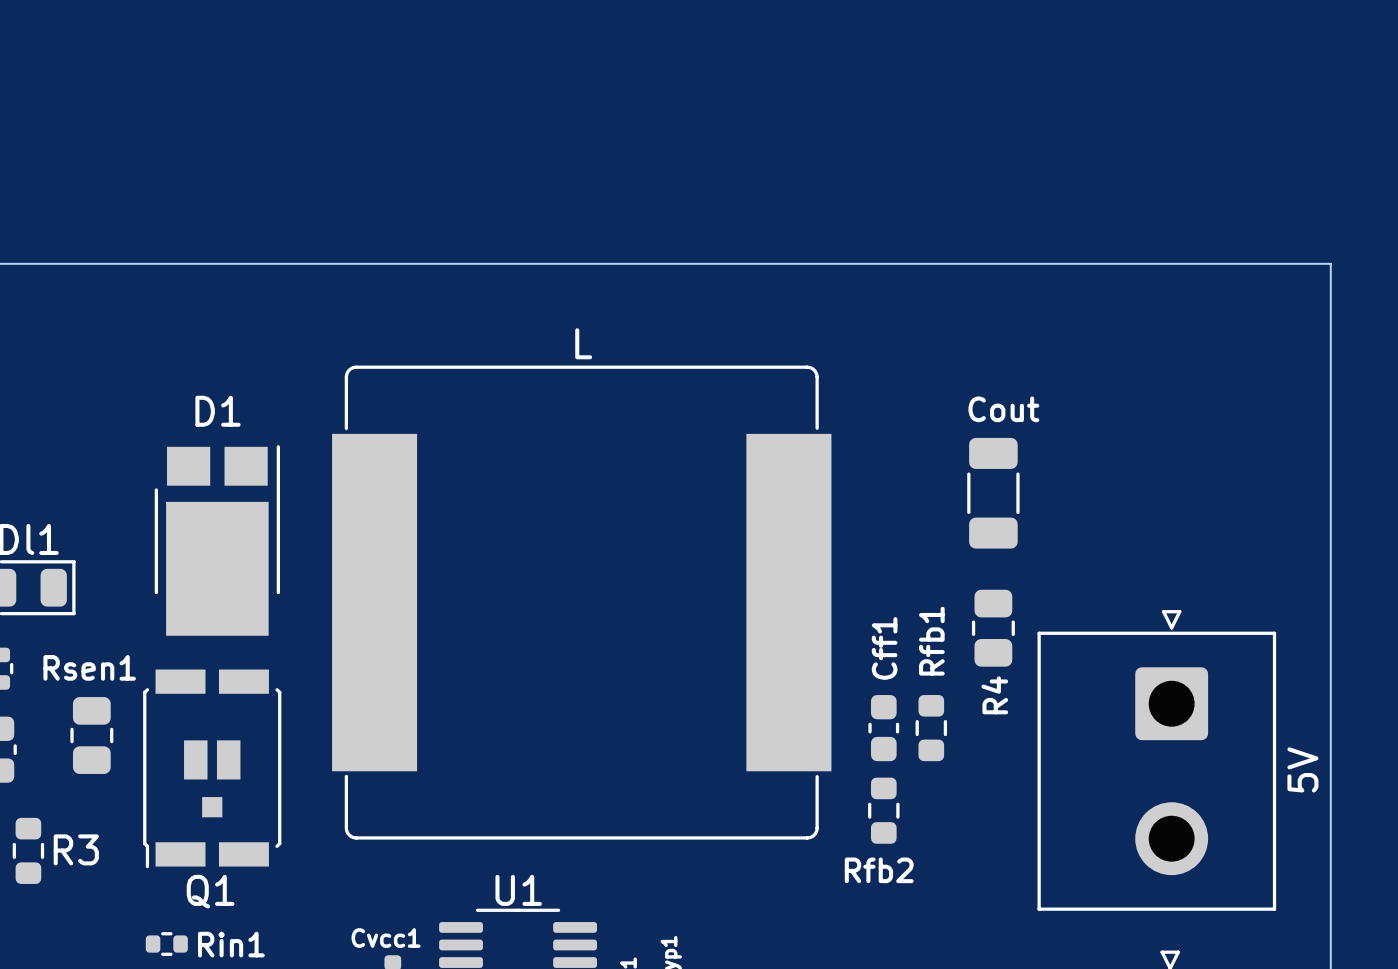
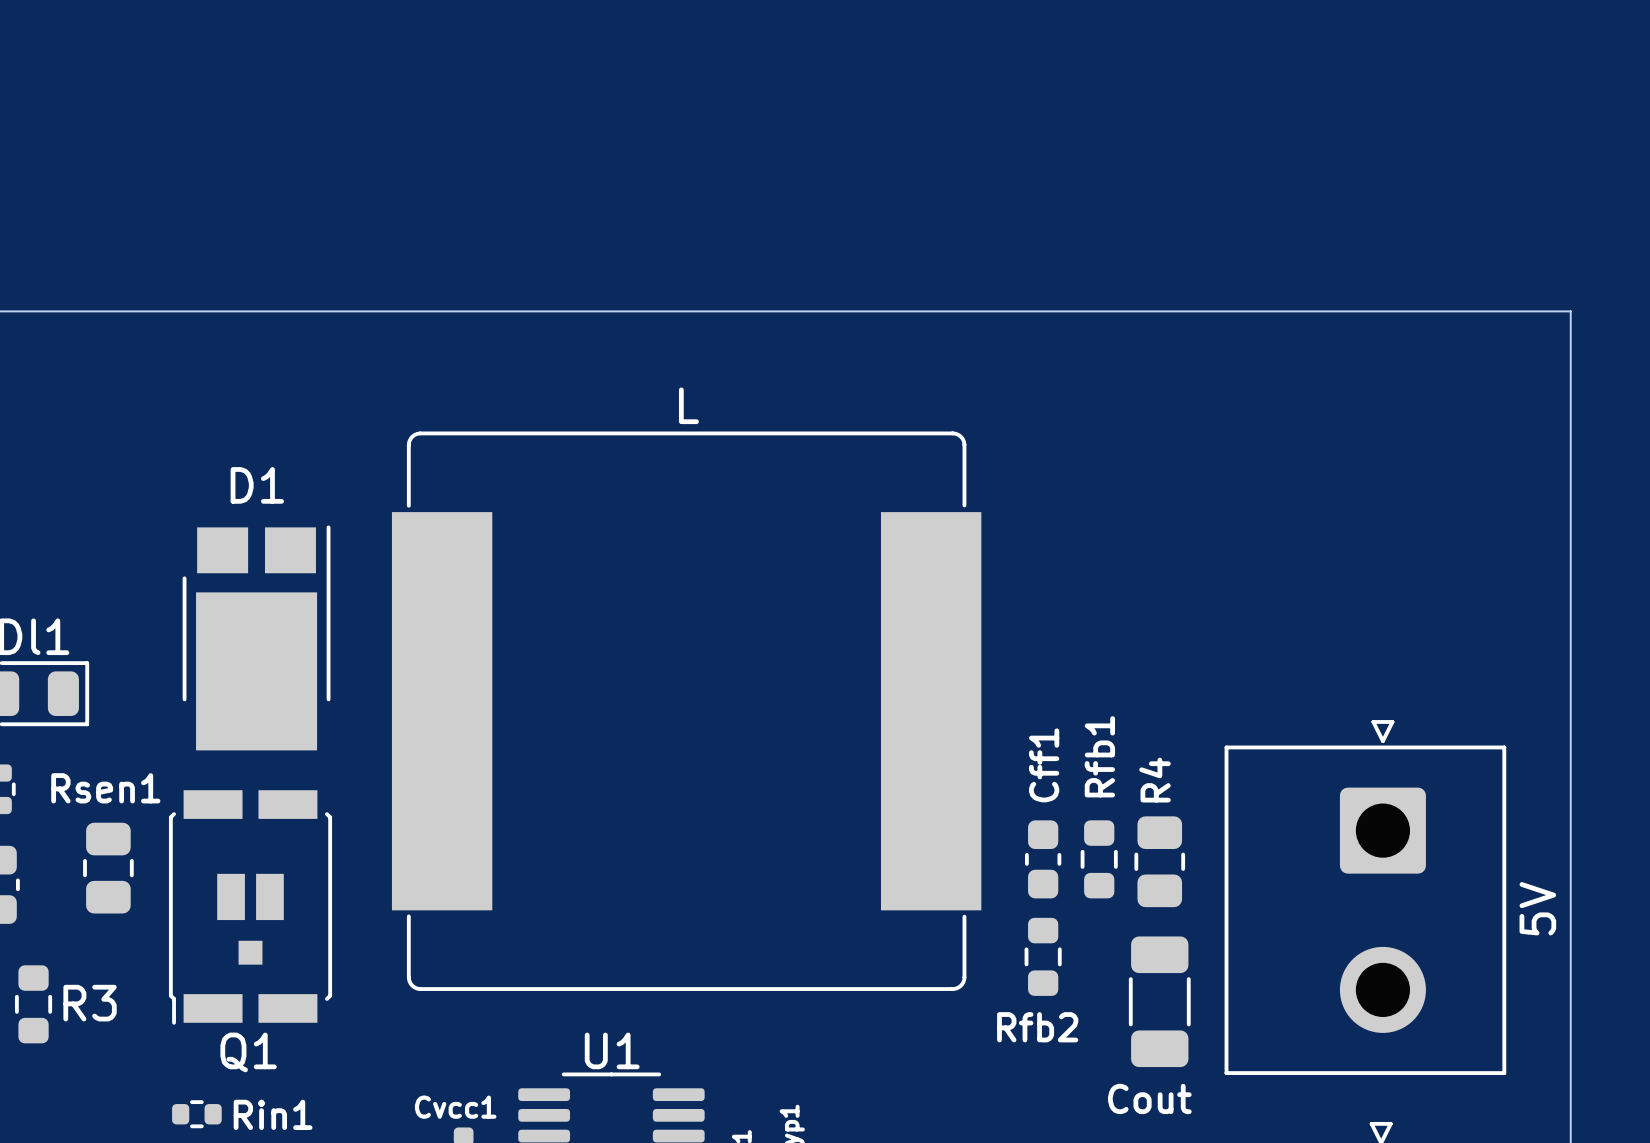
Cout name position: Cout (1003, 409) -> Cout (1149, 1098)
Cout position: (993, 493) -> (1159, 1001)
R4 position: (993, 628) -> (1159, 861)
R4 name position: R4 (994, 695) -> R4 (1155, 780)

